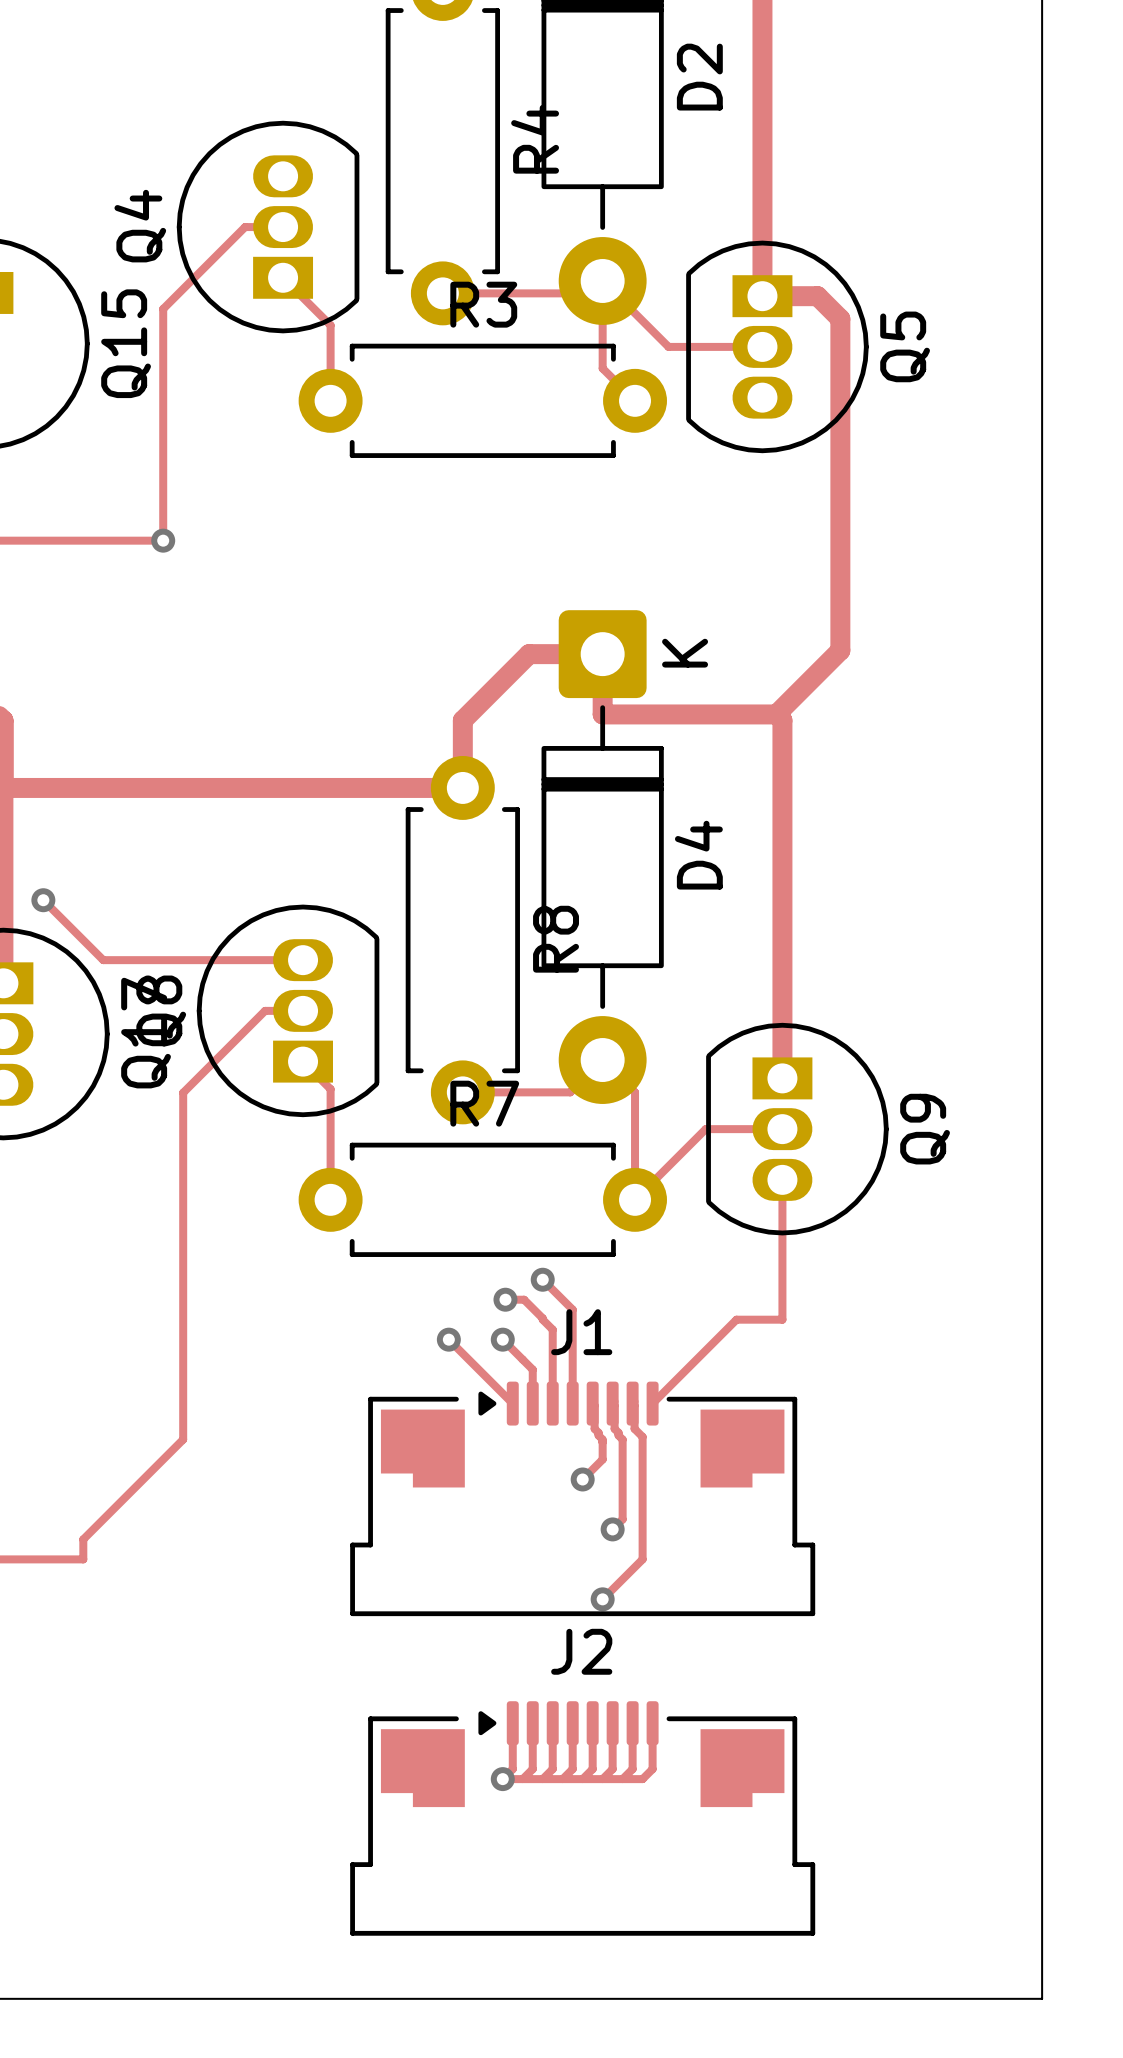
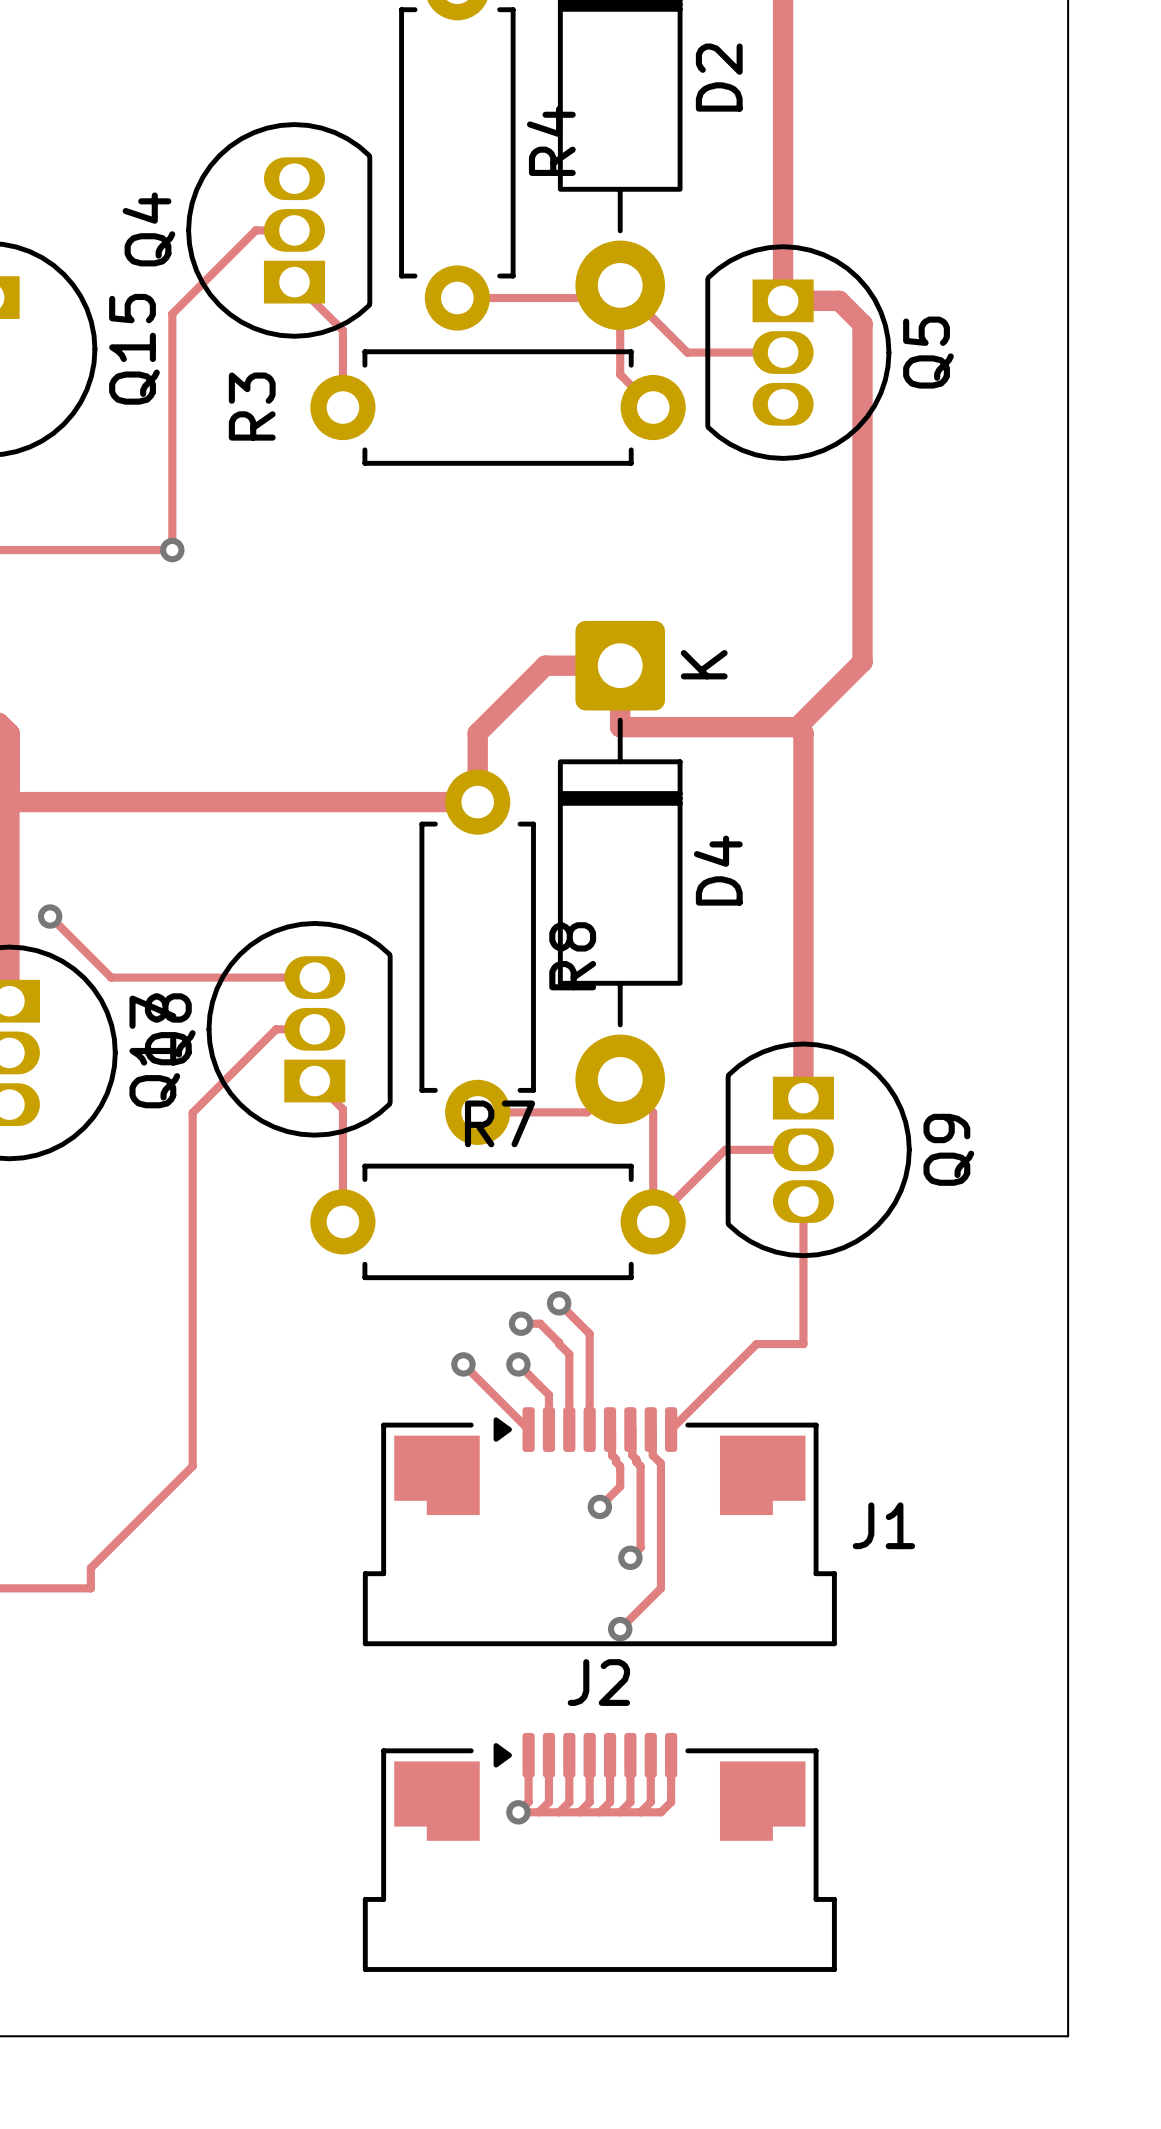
R3 name rotation: 0° (483, 304) -> 90° counterclockwise (252, 406)
R3 name position: R3 (483, 304) -> R3 (252, 406)
J1 name position: J1 (581, 1332) -> J1 (883, 1525)

